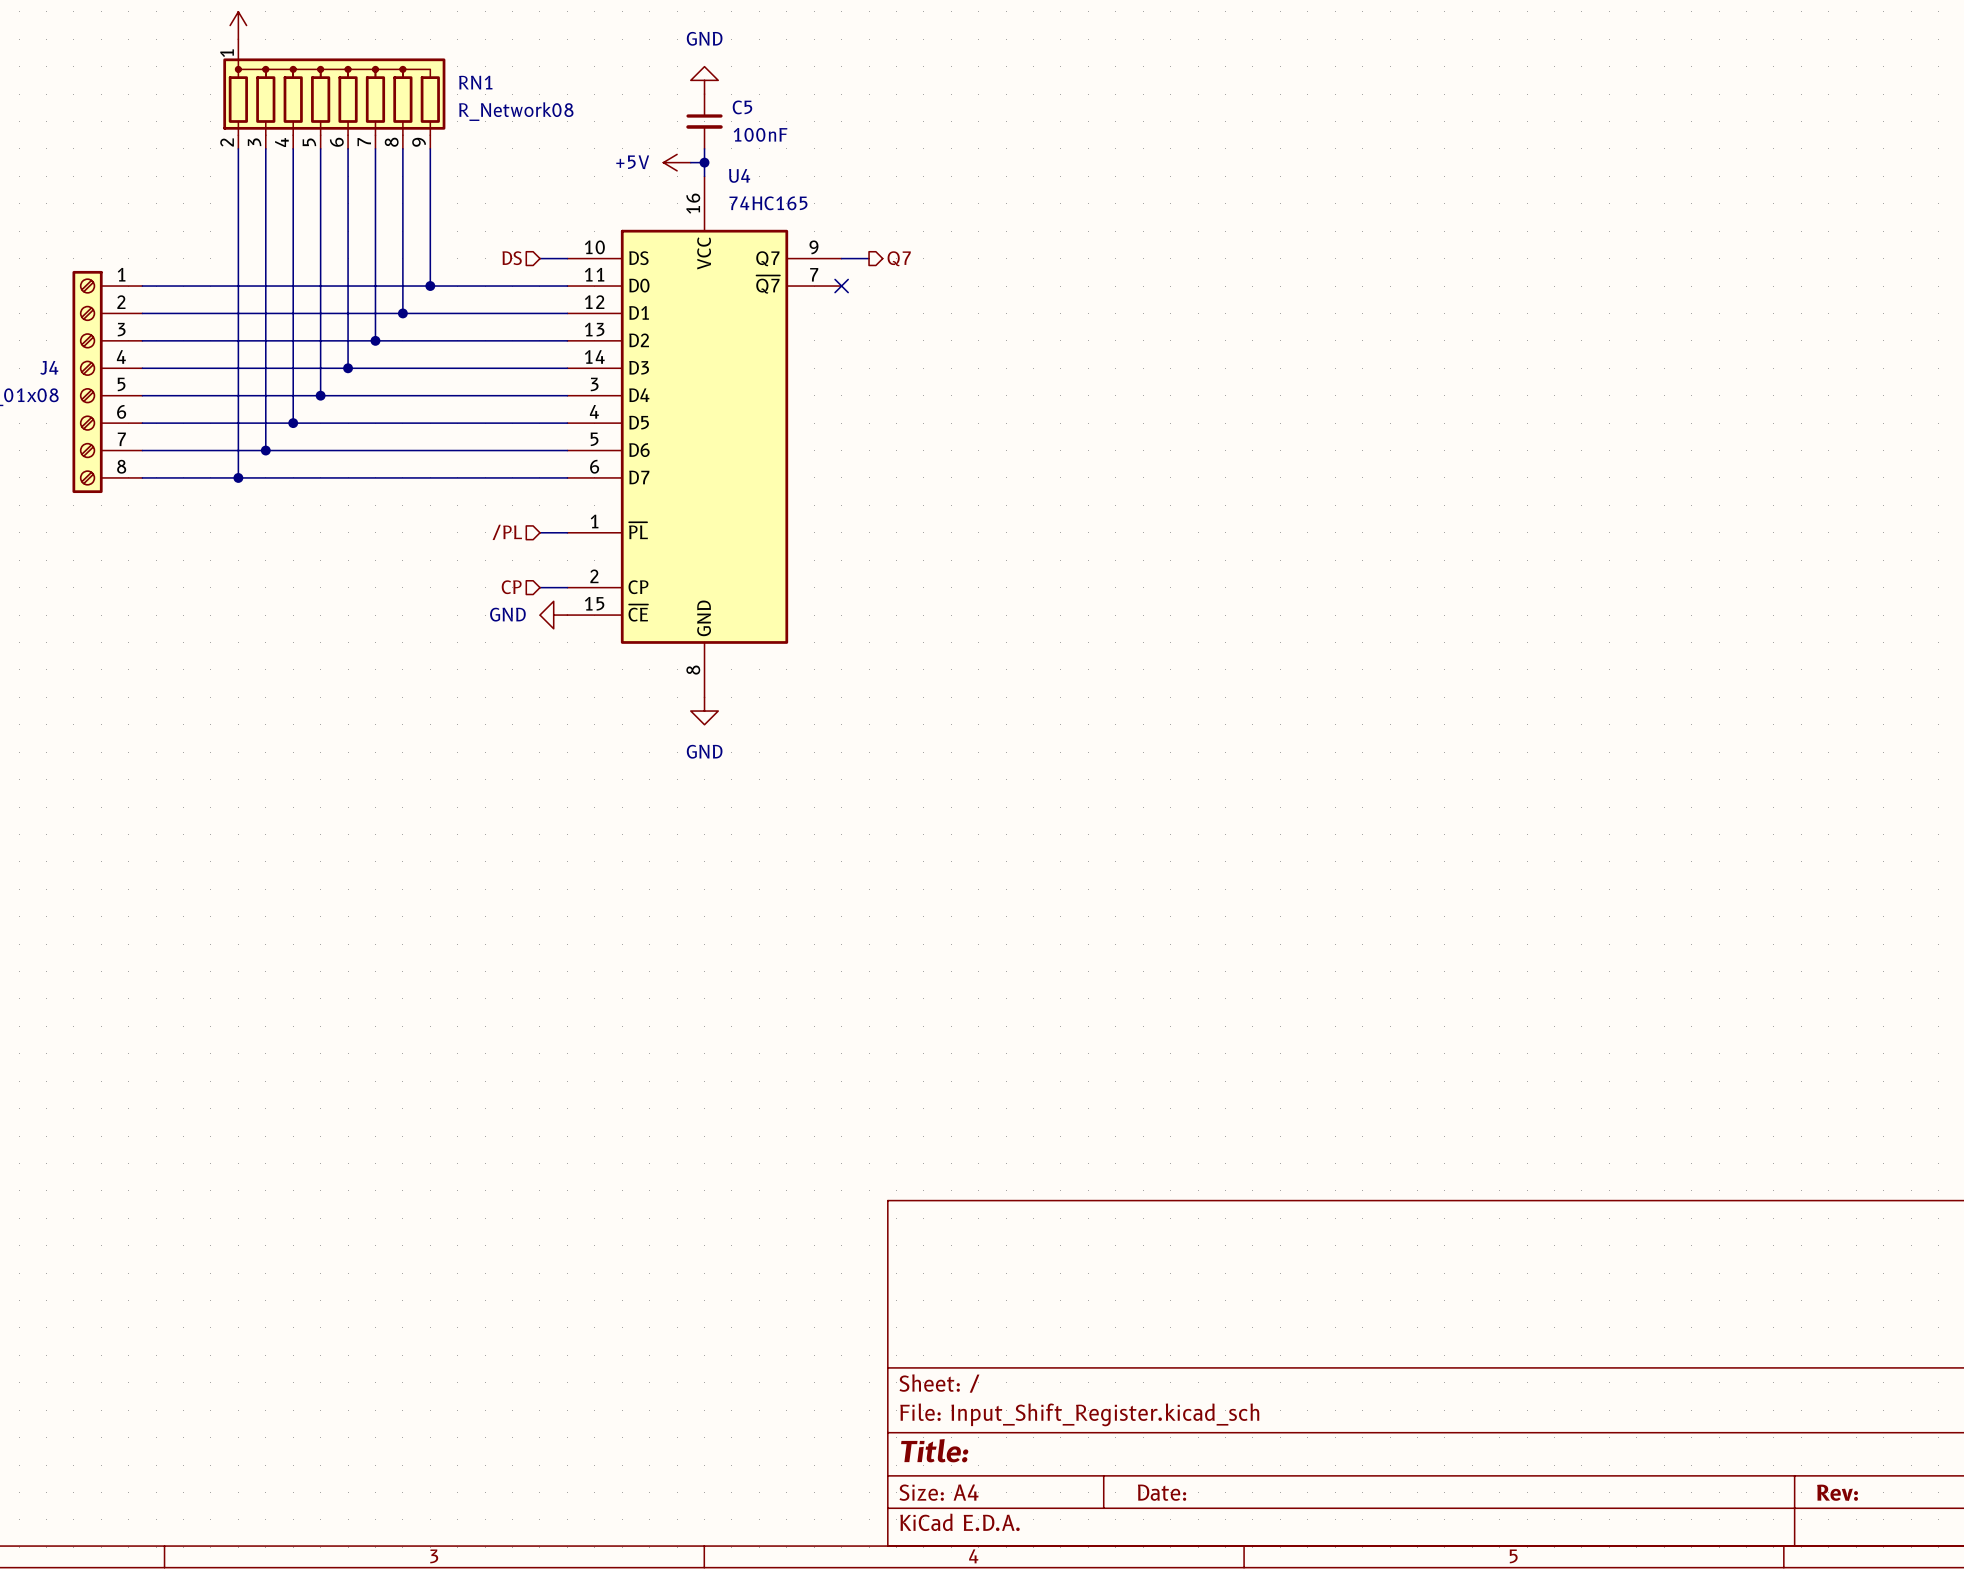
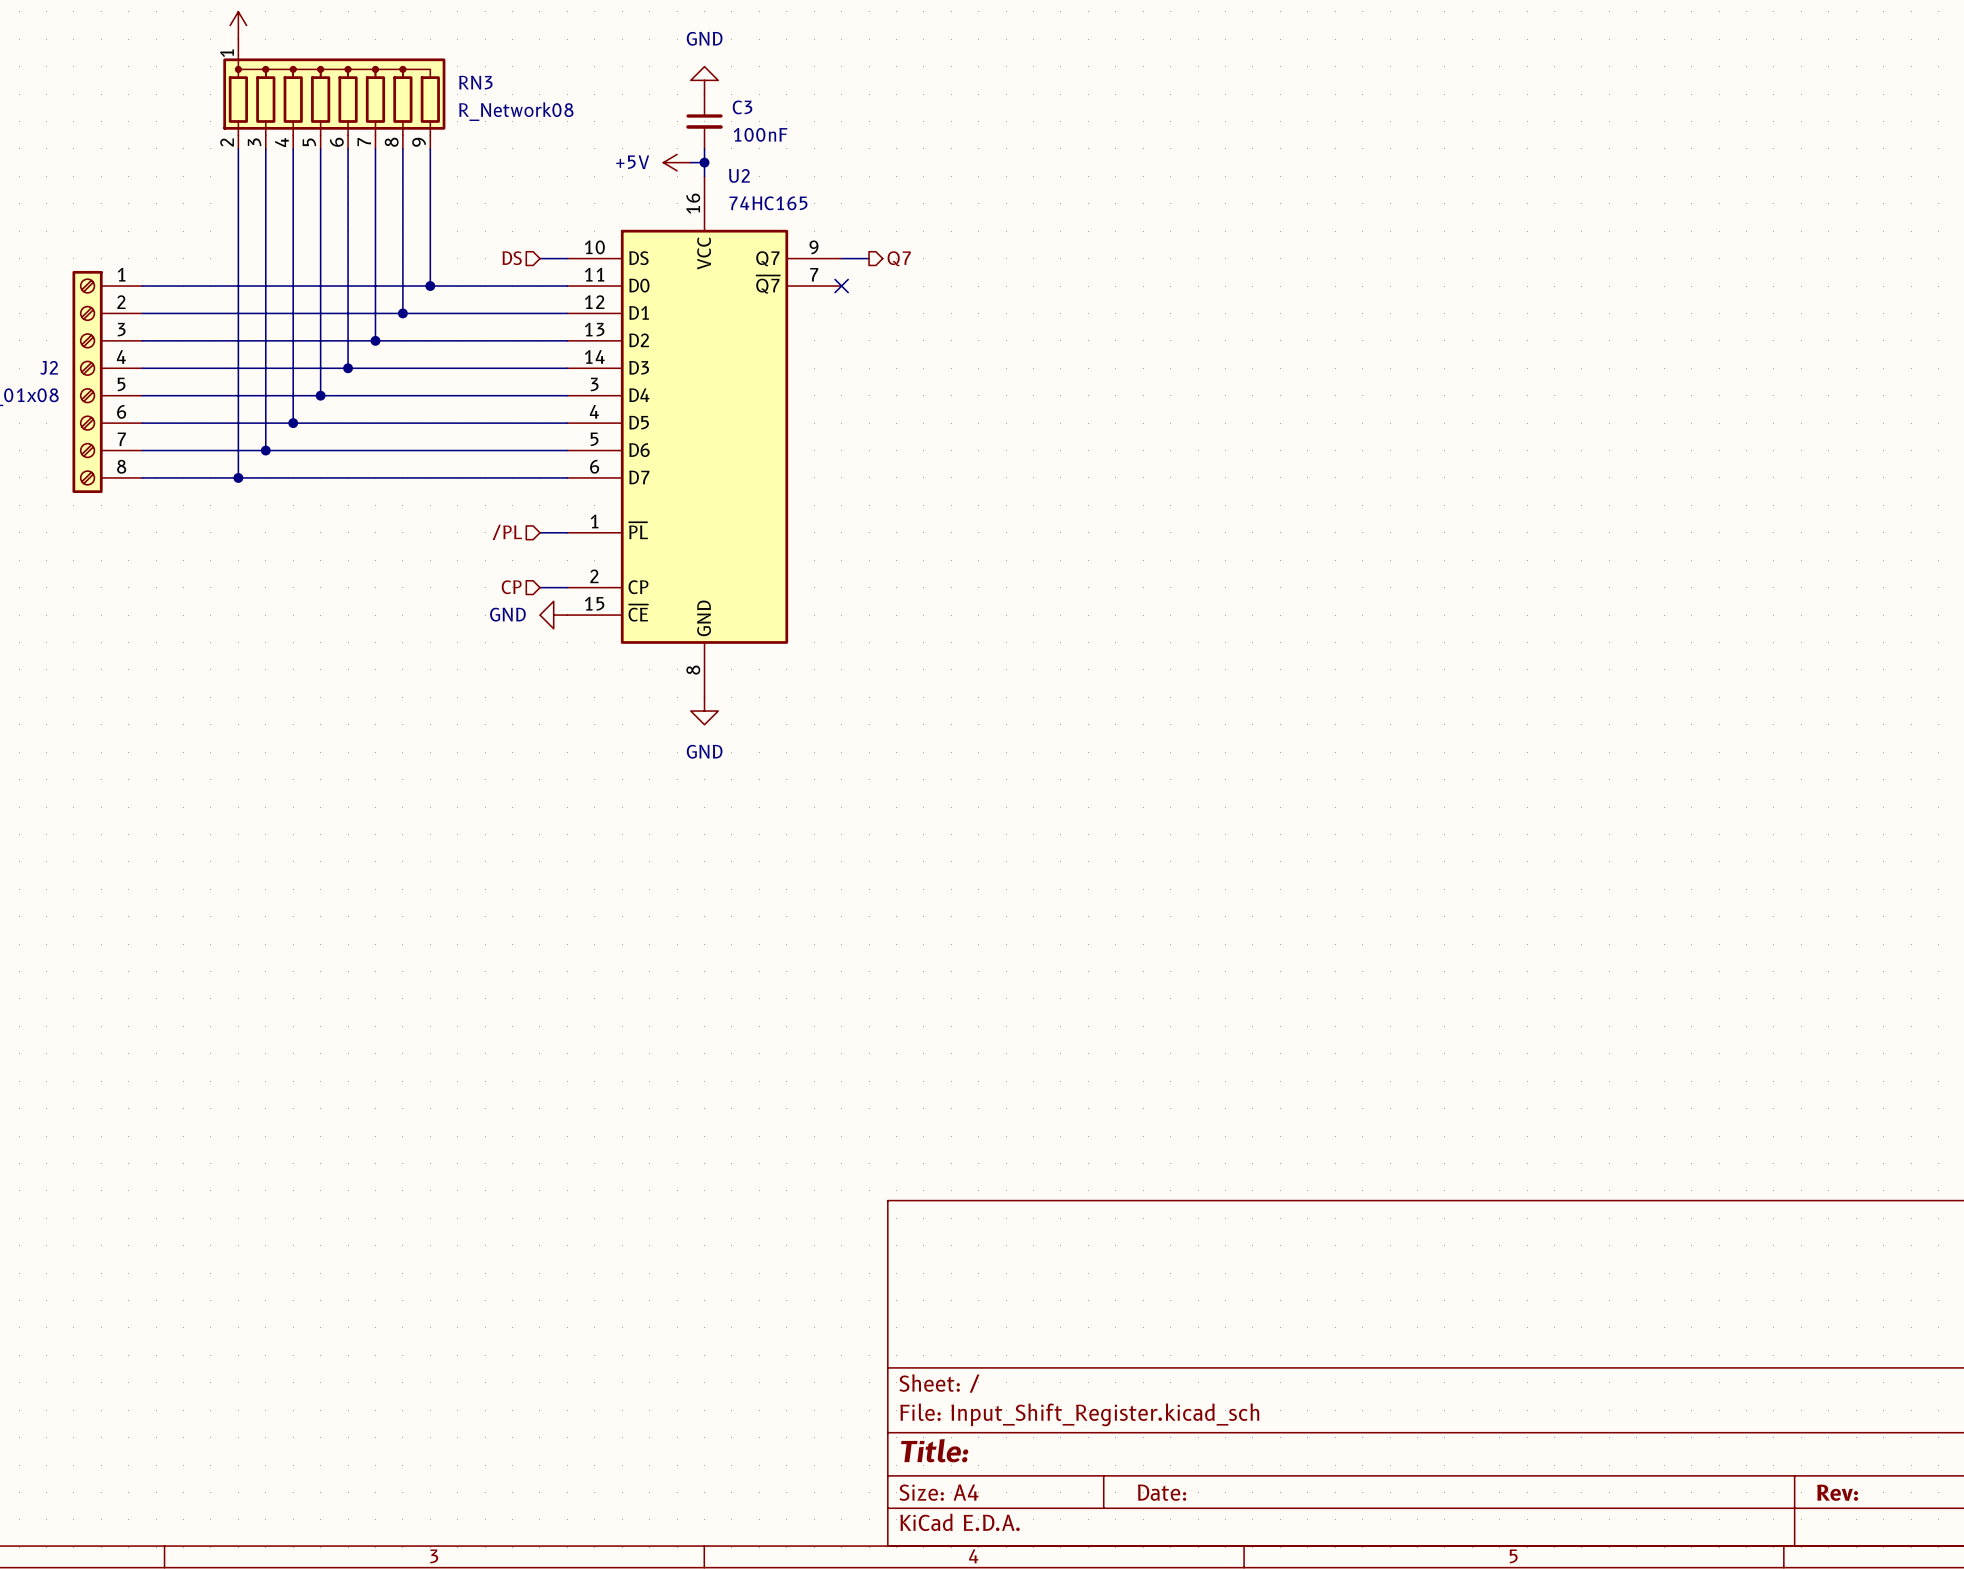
RN1 name: RN1 (475, 82) -> RN3 (475, 82)
C5 name: C5 (742, 107) -> C3 (742, 107)
U4 name: U4 (739, 175) -> U2 (739, 175)
J4 name: J4 (49, 367) -> J2 (49, 367)

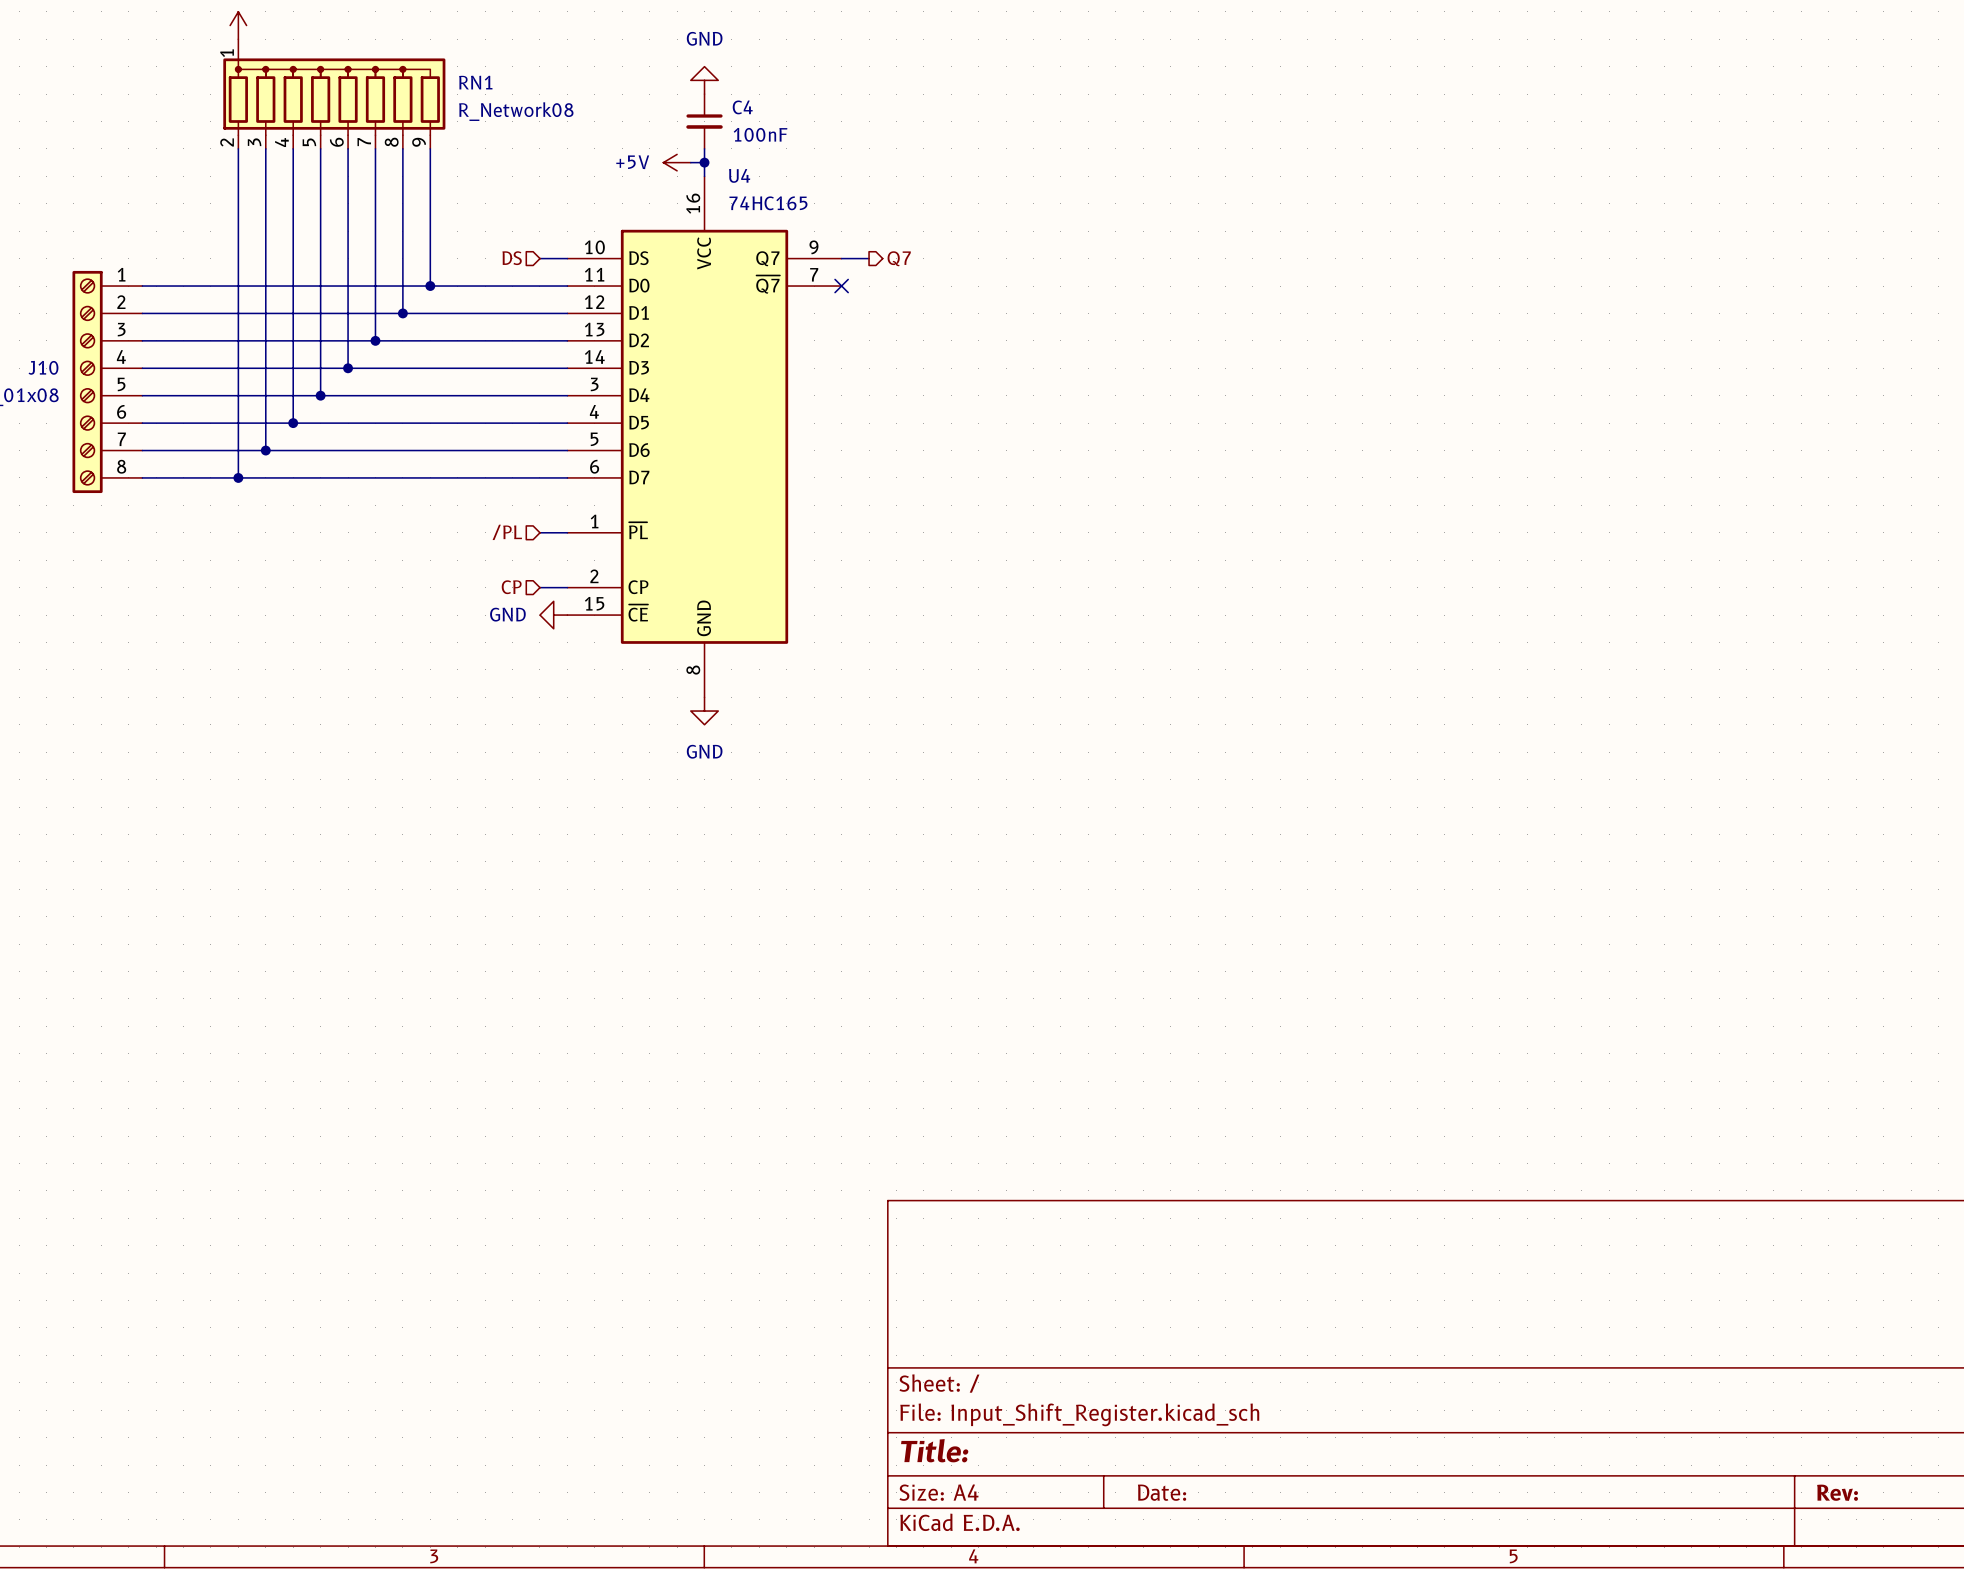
RN3 name: RN3 (475, 82) -> RN1 (475, 82)
C3 name: C3 (742, 107) -> C4 (742, 107)
U2 name: U2 (739, 175) -> U4 (739, 175)
J2 name: J2 (49, 367) -> J10 (43, 367)

